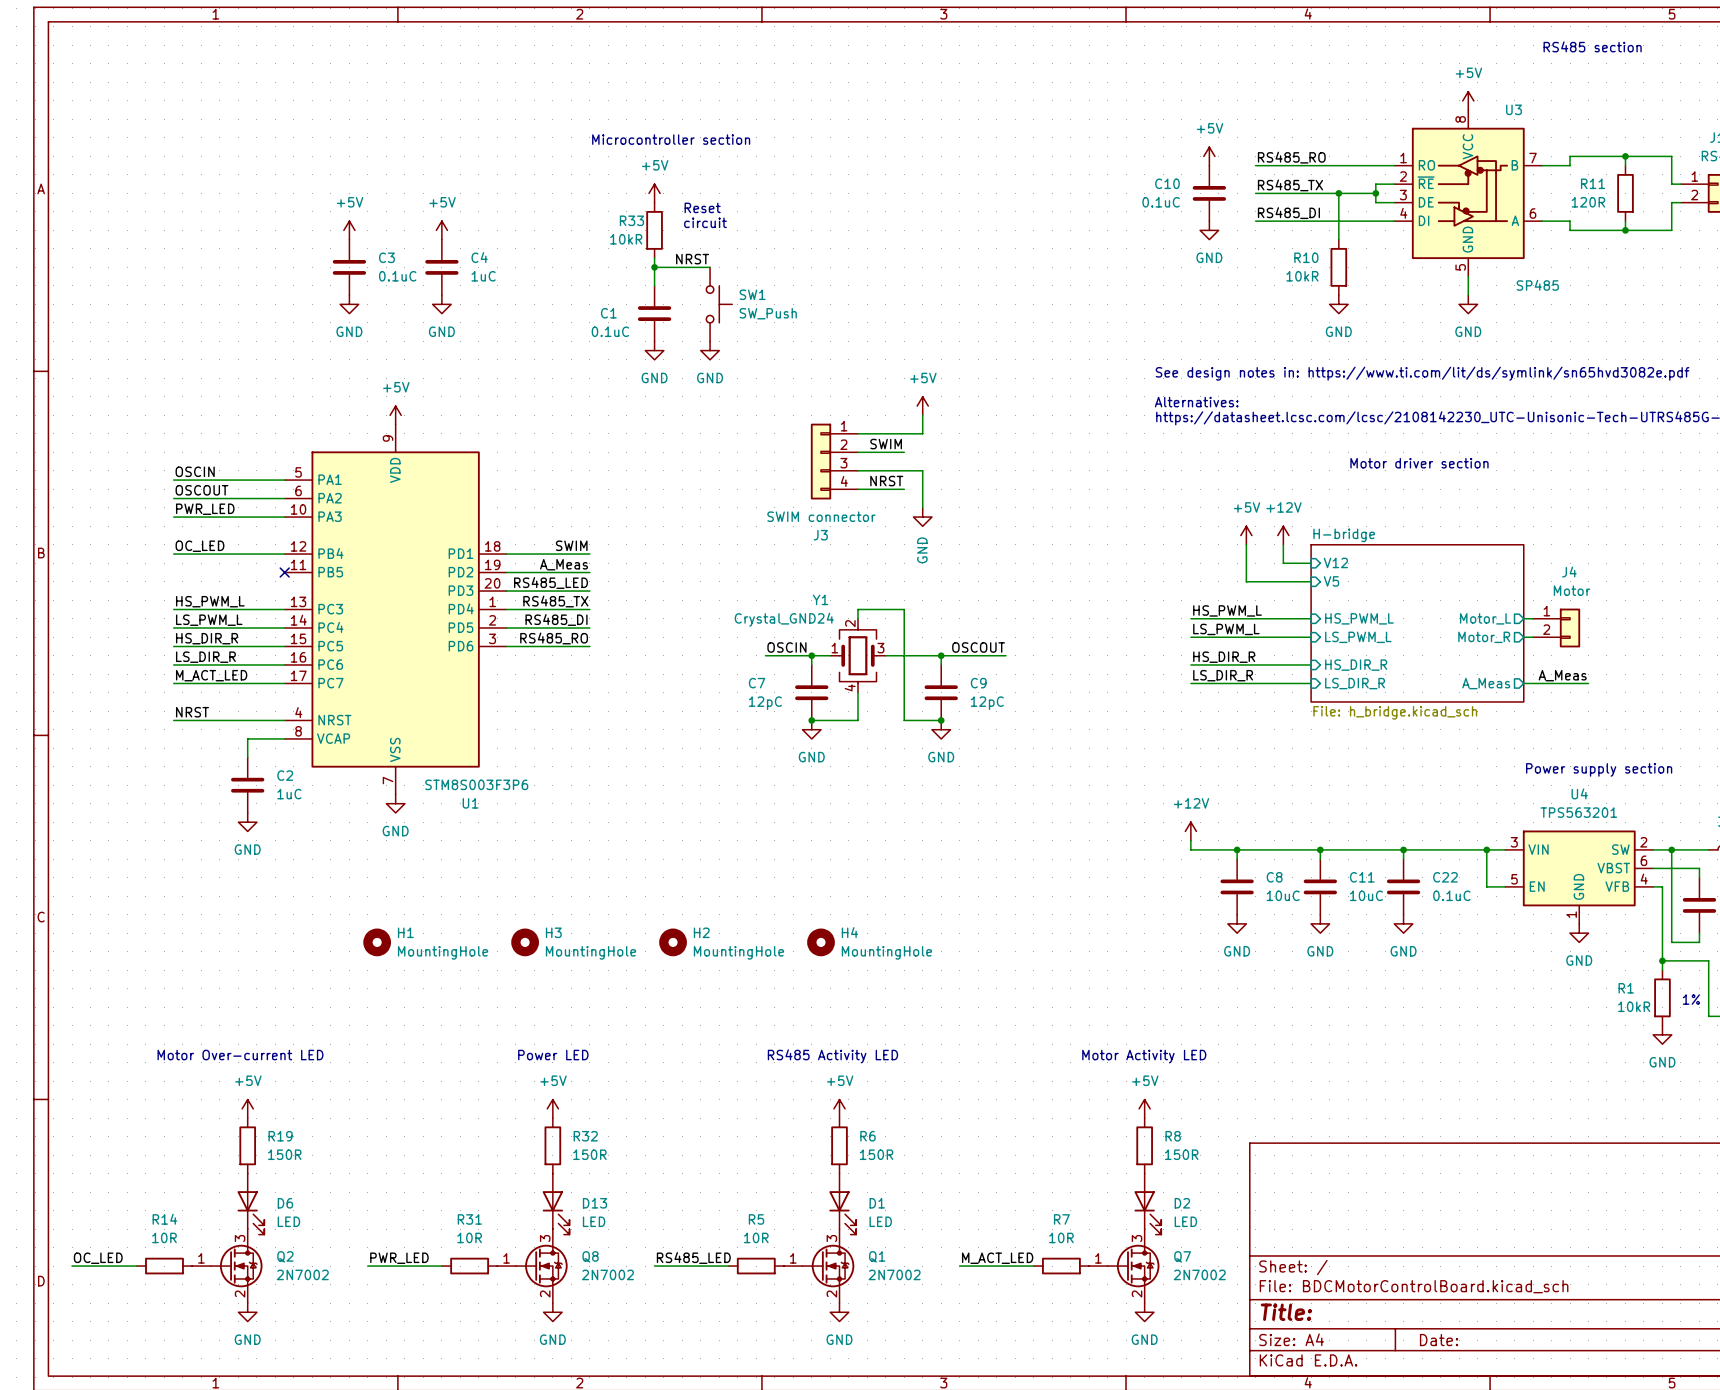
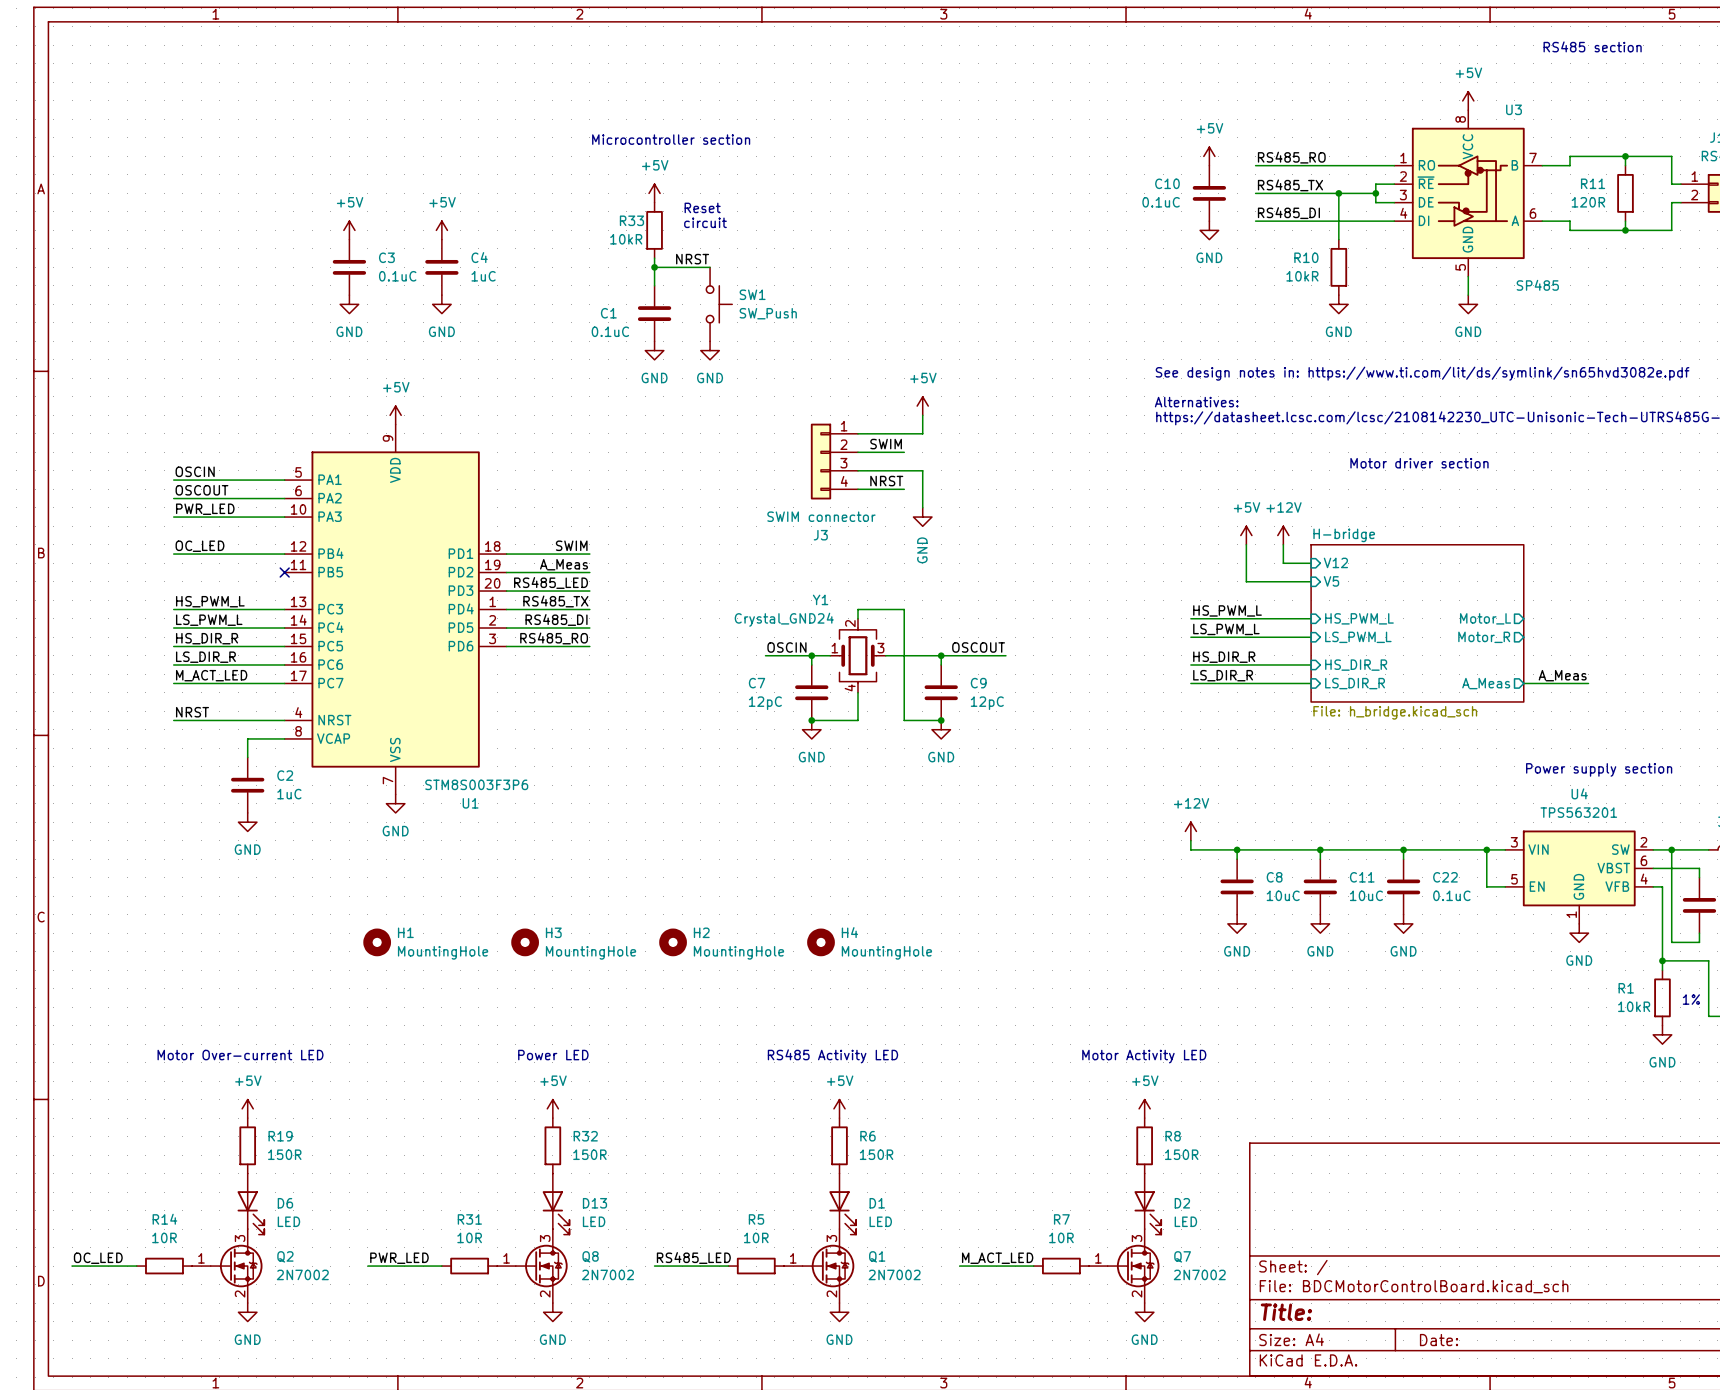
wire: (1523, 618) (1533, 618) -> none
J4: Motor (1556, 628) -> none
wire: (1523, 637) (1533, 637) -> none

